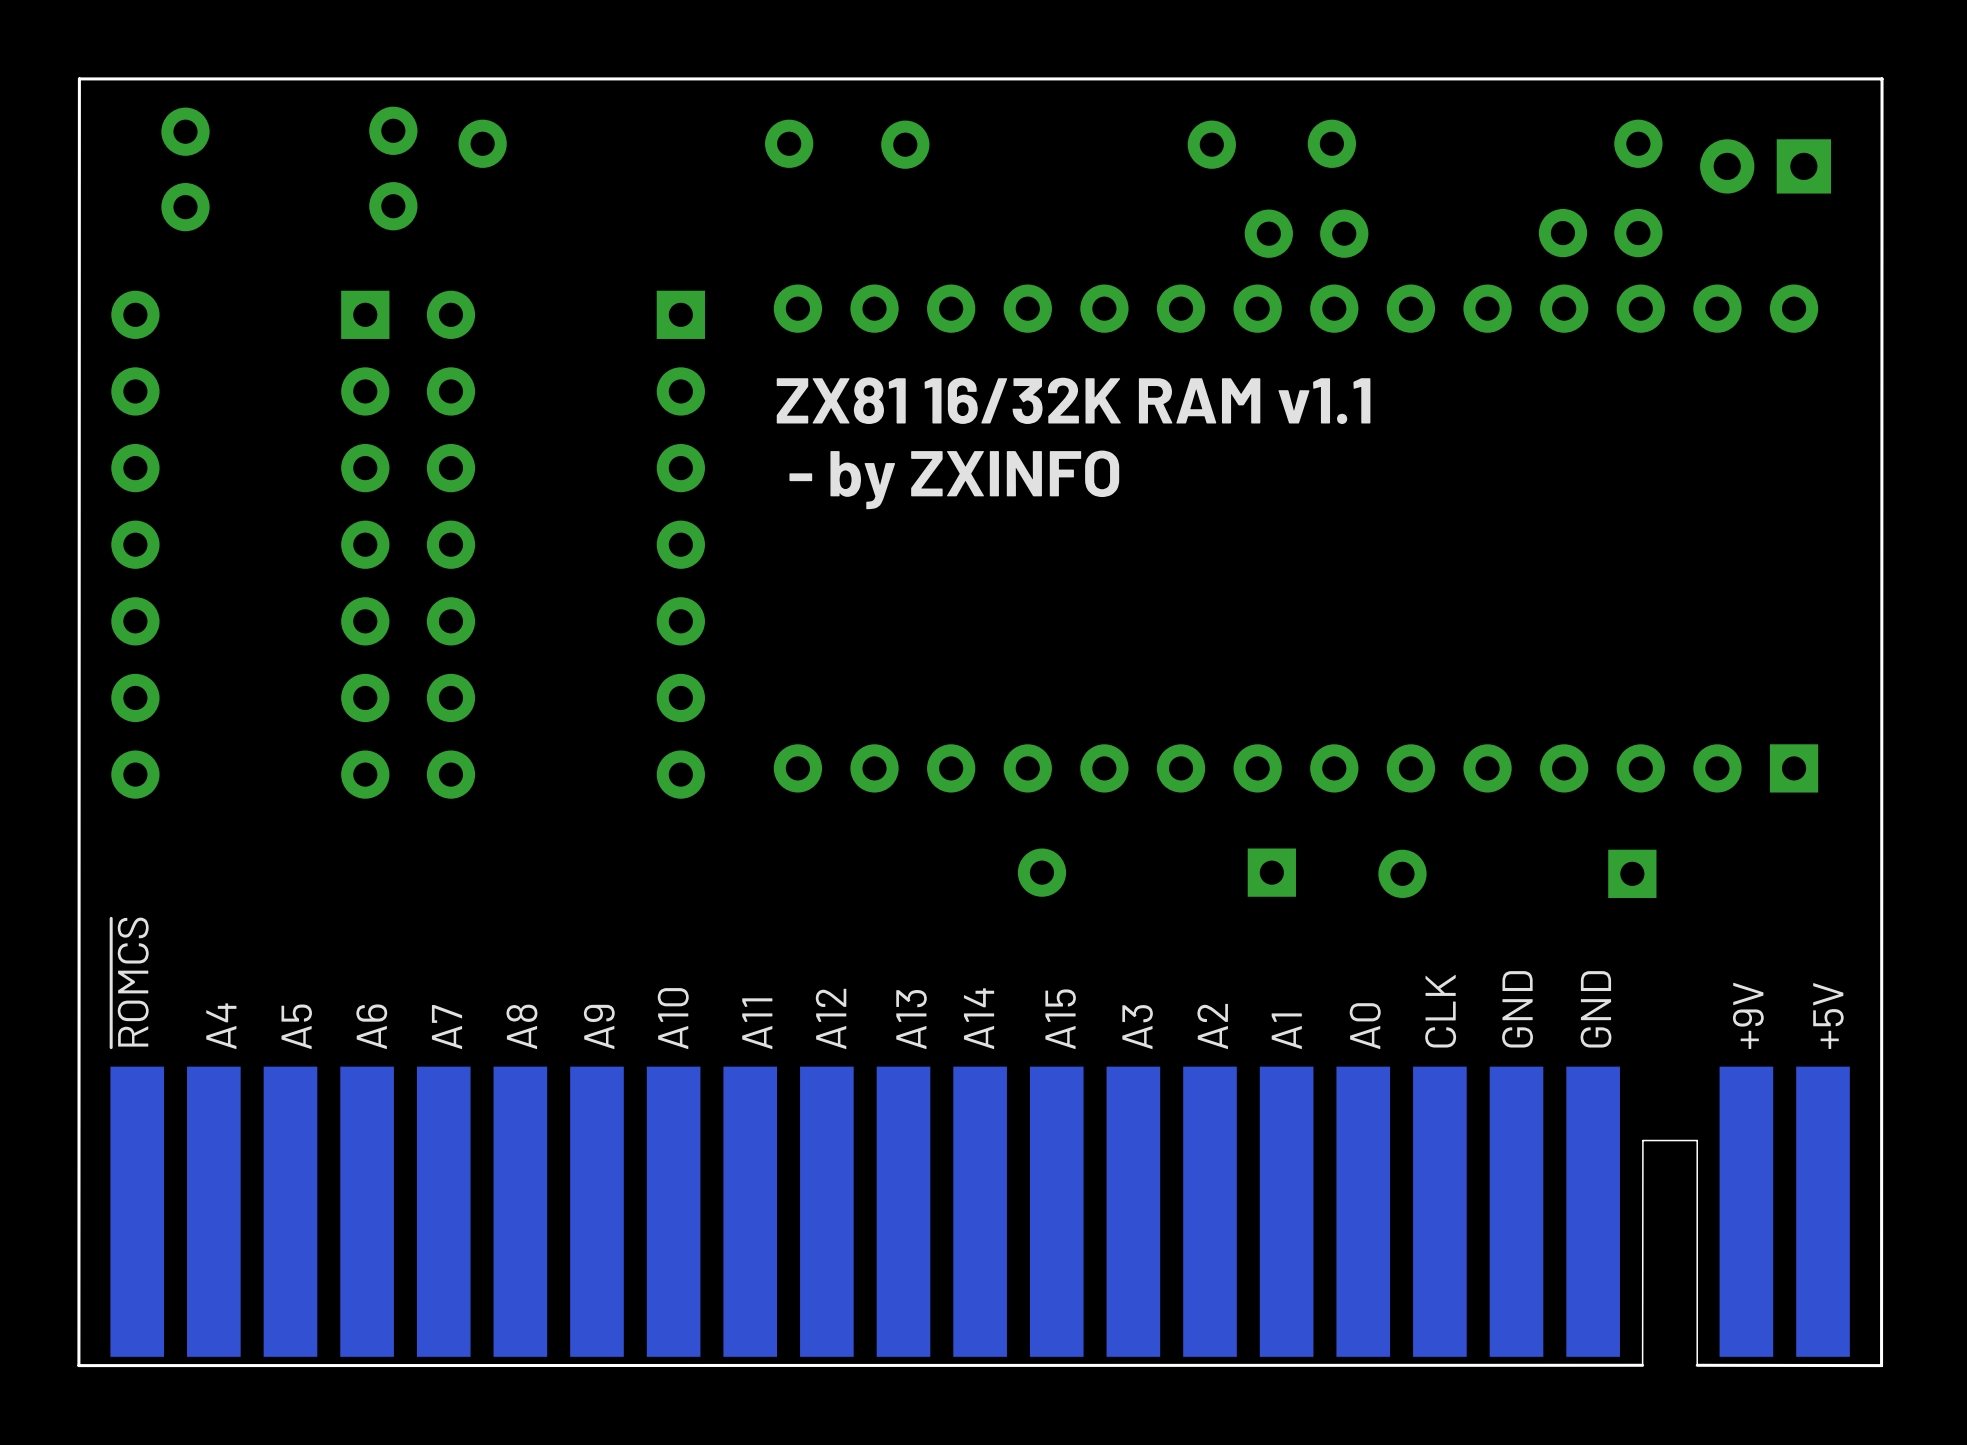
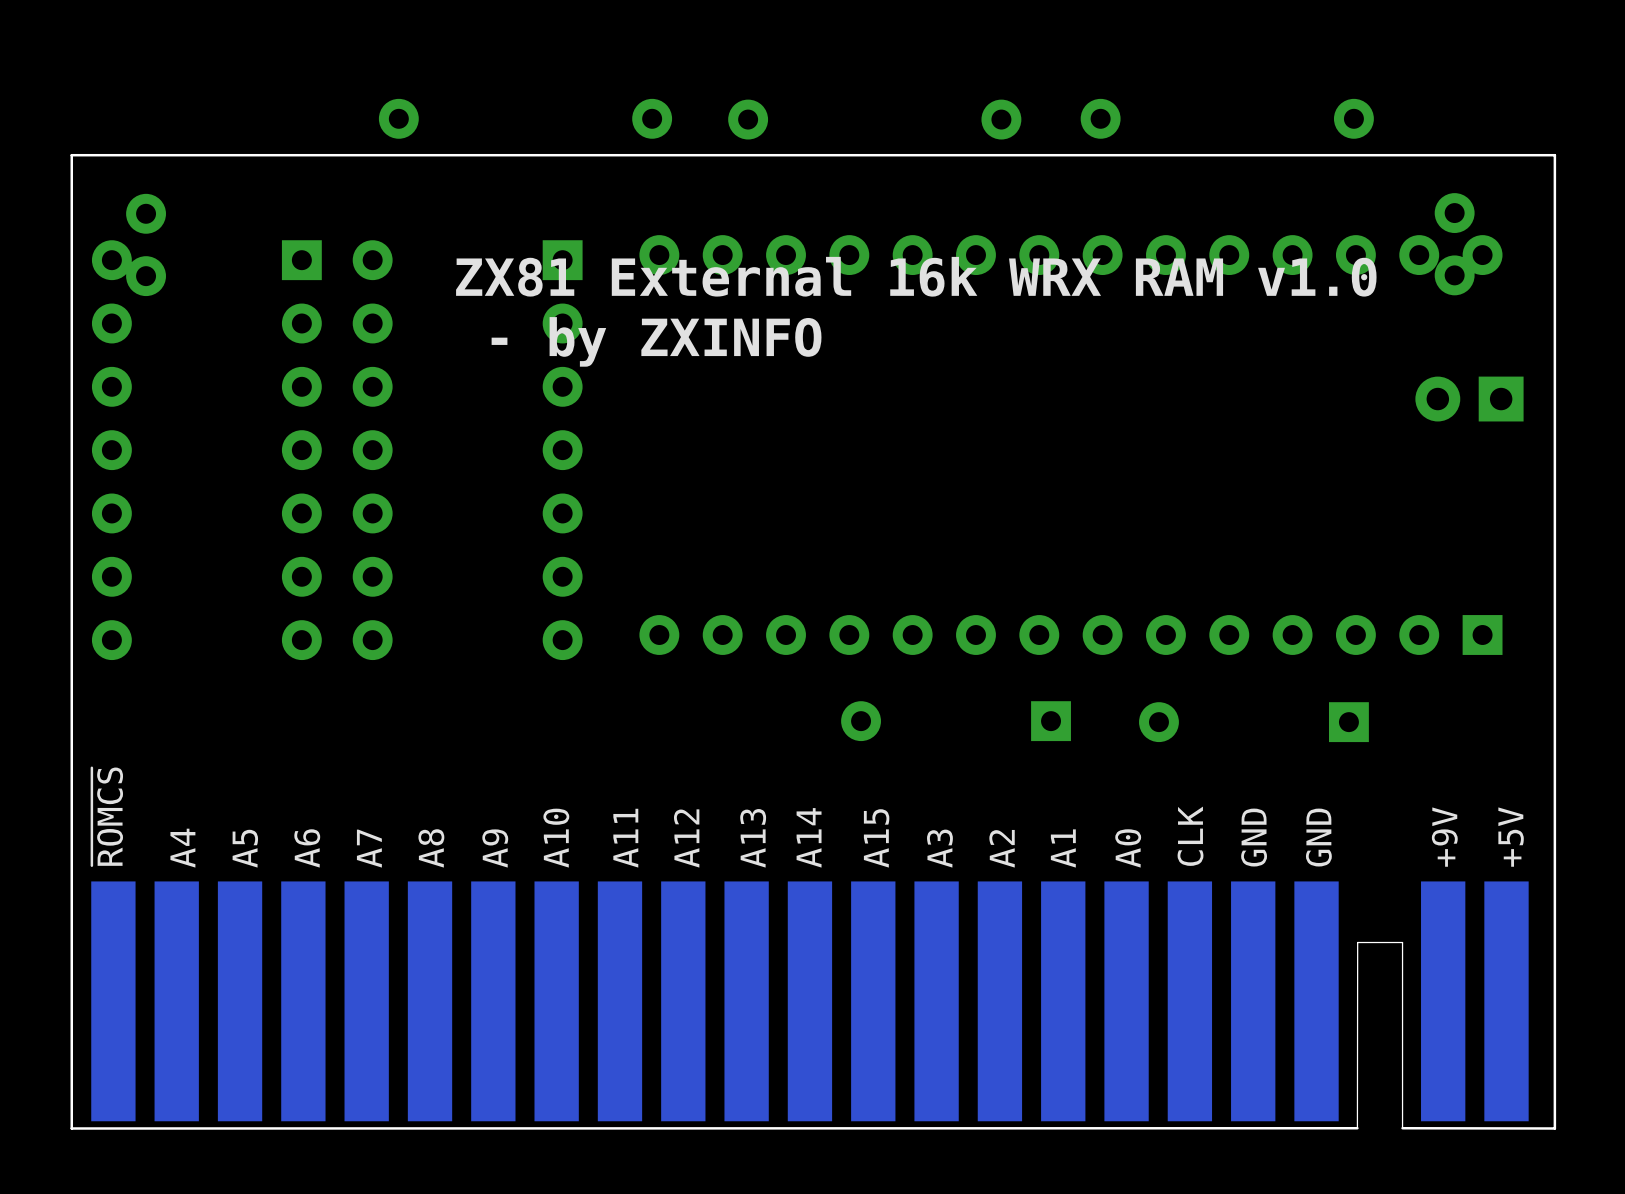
part position: (1765, 166) -> (1469, 399)
part: (393, 168) -> none
part: (185, 169) -> none
part: (1306, 233) -> none
part rotation: 0° (1600, 233) -> 90° clockwise (1454, 244)
part position: (1600, 233) -> (1454, 244)
part: none -> (146, 244)
text: none -> ZX81 External 16k WRX RAM v1.0 (916, 276)
text: ZX81 16/32K RAM v1.1 (1073, 400) -> none
text position: - by ZXINFO (954, 479) -> - by ZXINFO (656, 341)
board edge: (1881, 1365) (1882, 78) (79, 78) (78, 1365) (86, 1365) -> (1554, 1128) (1554, 155) (71, 155) (71, 1128)

